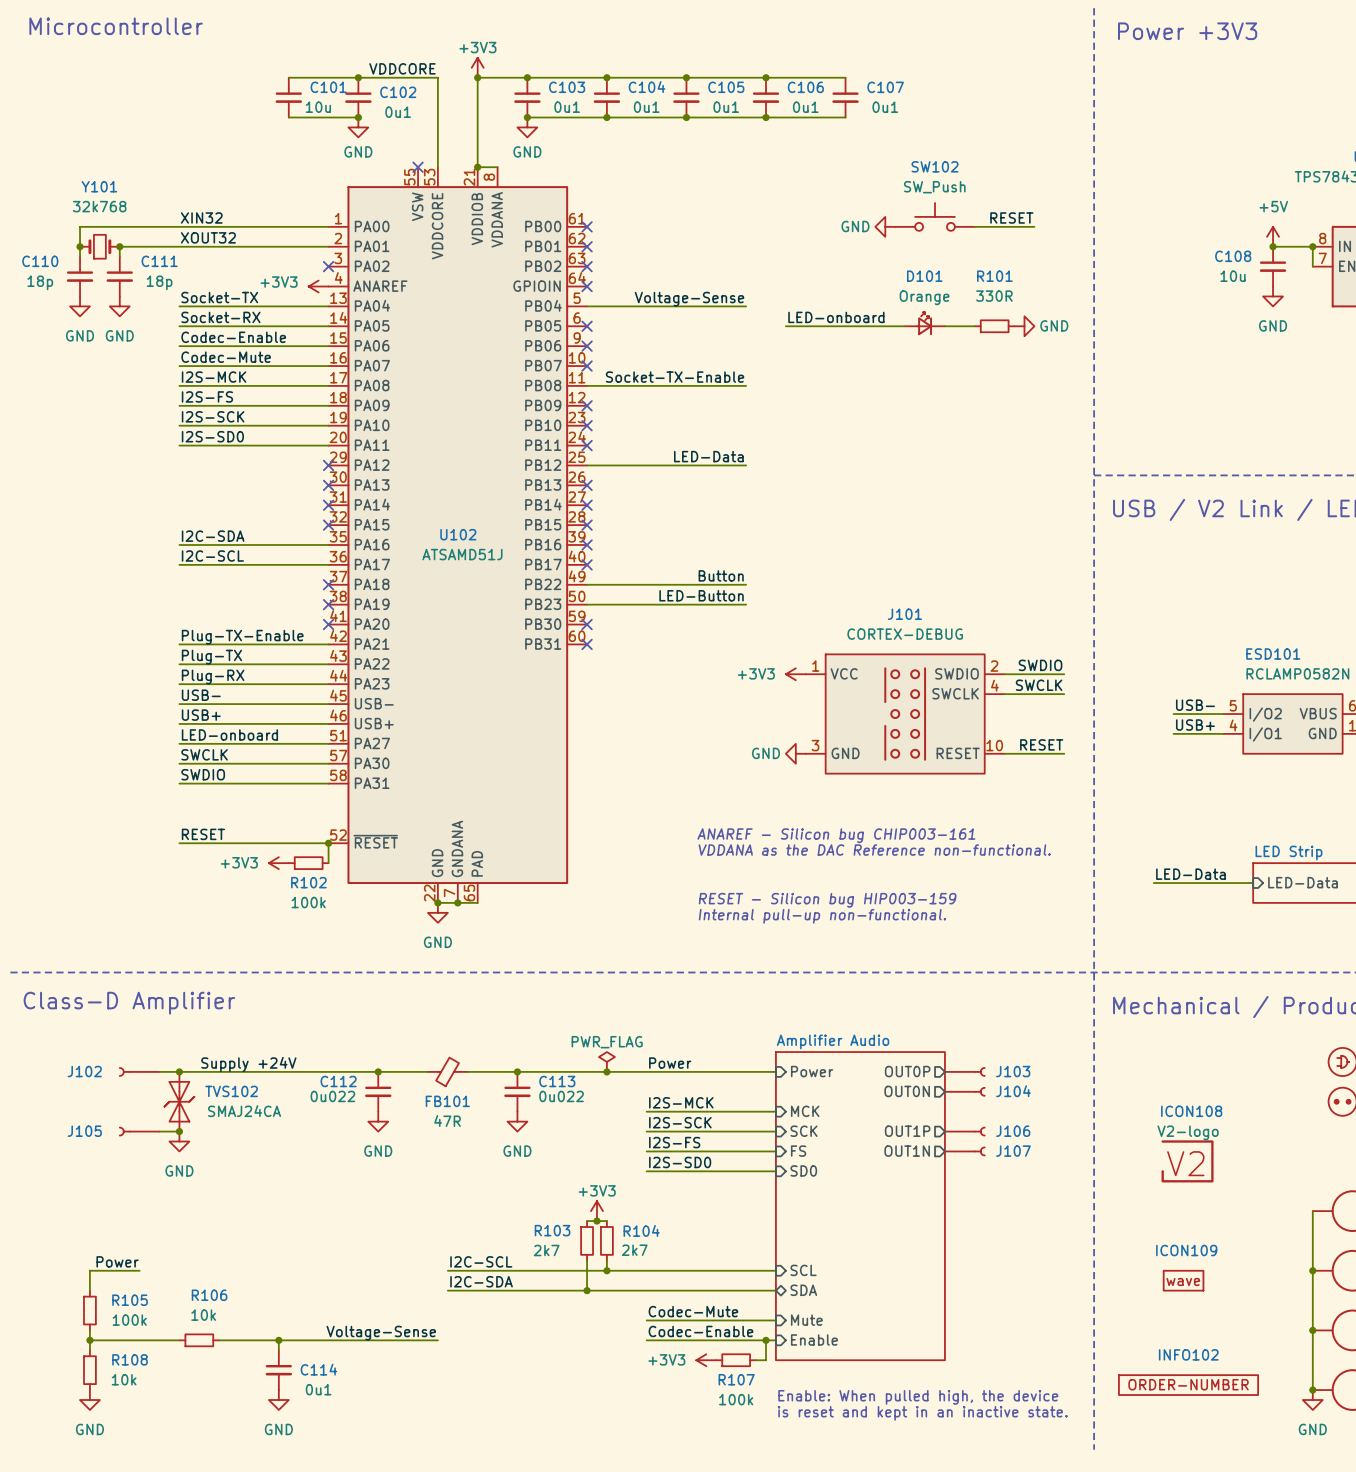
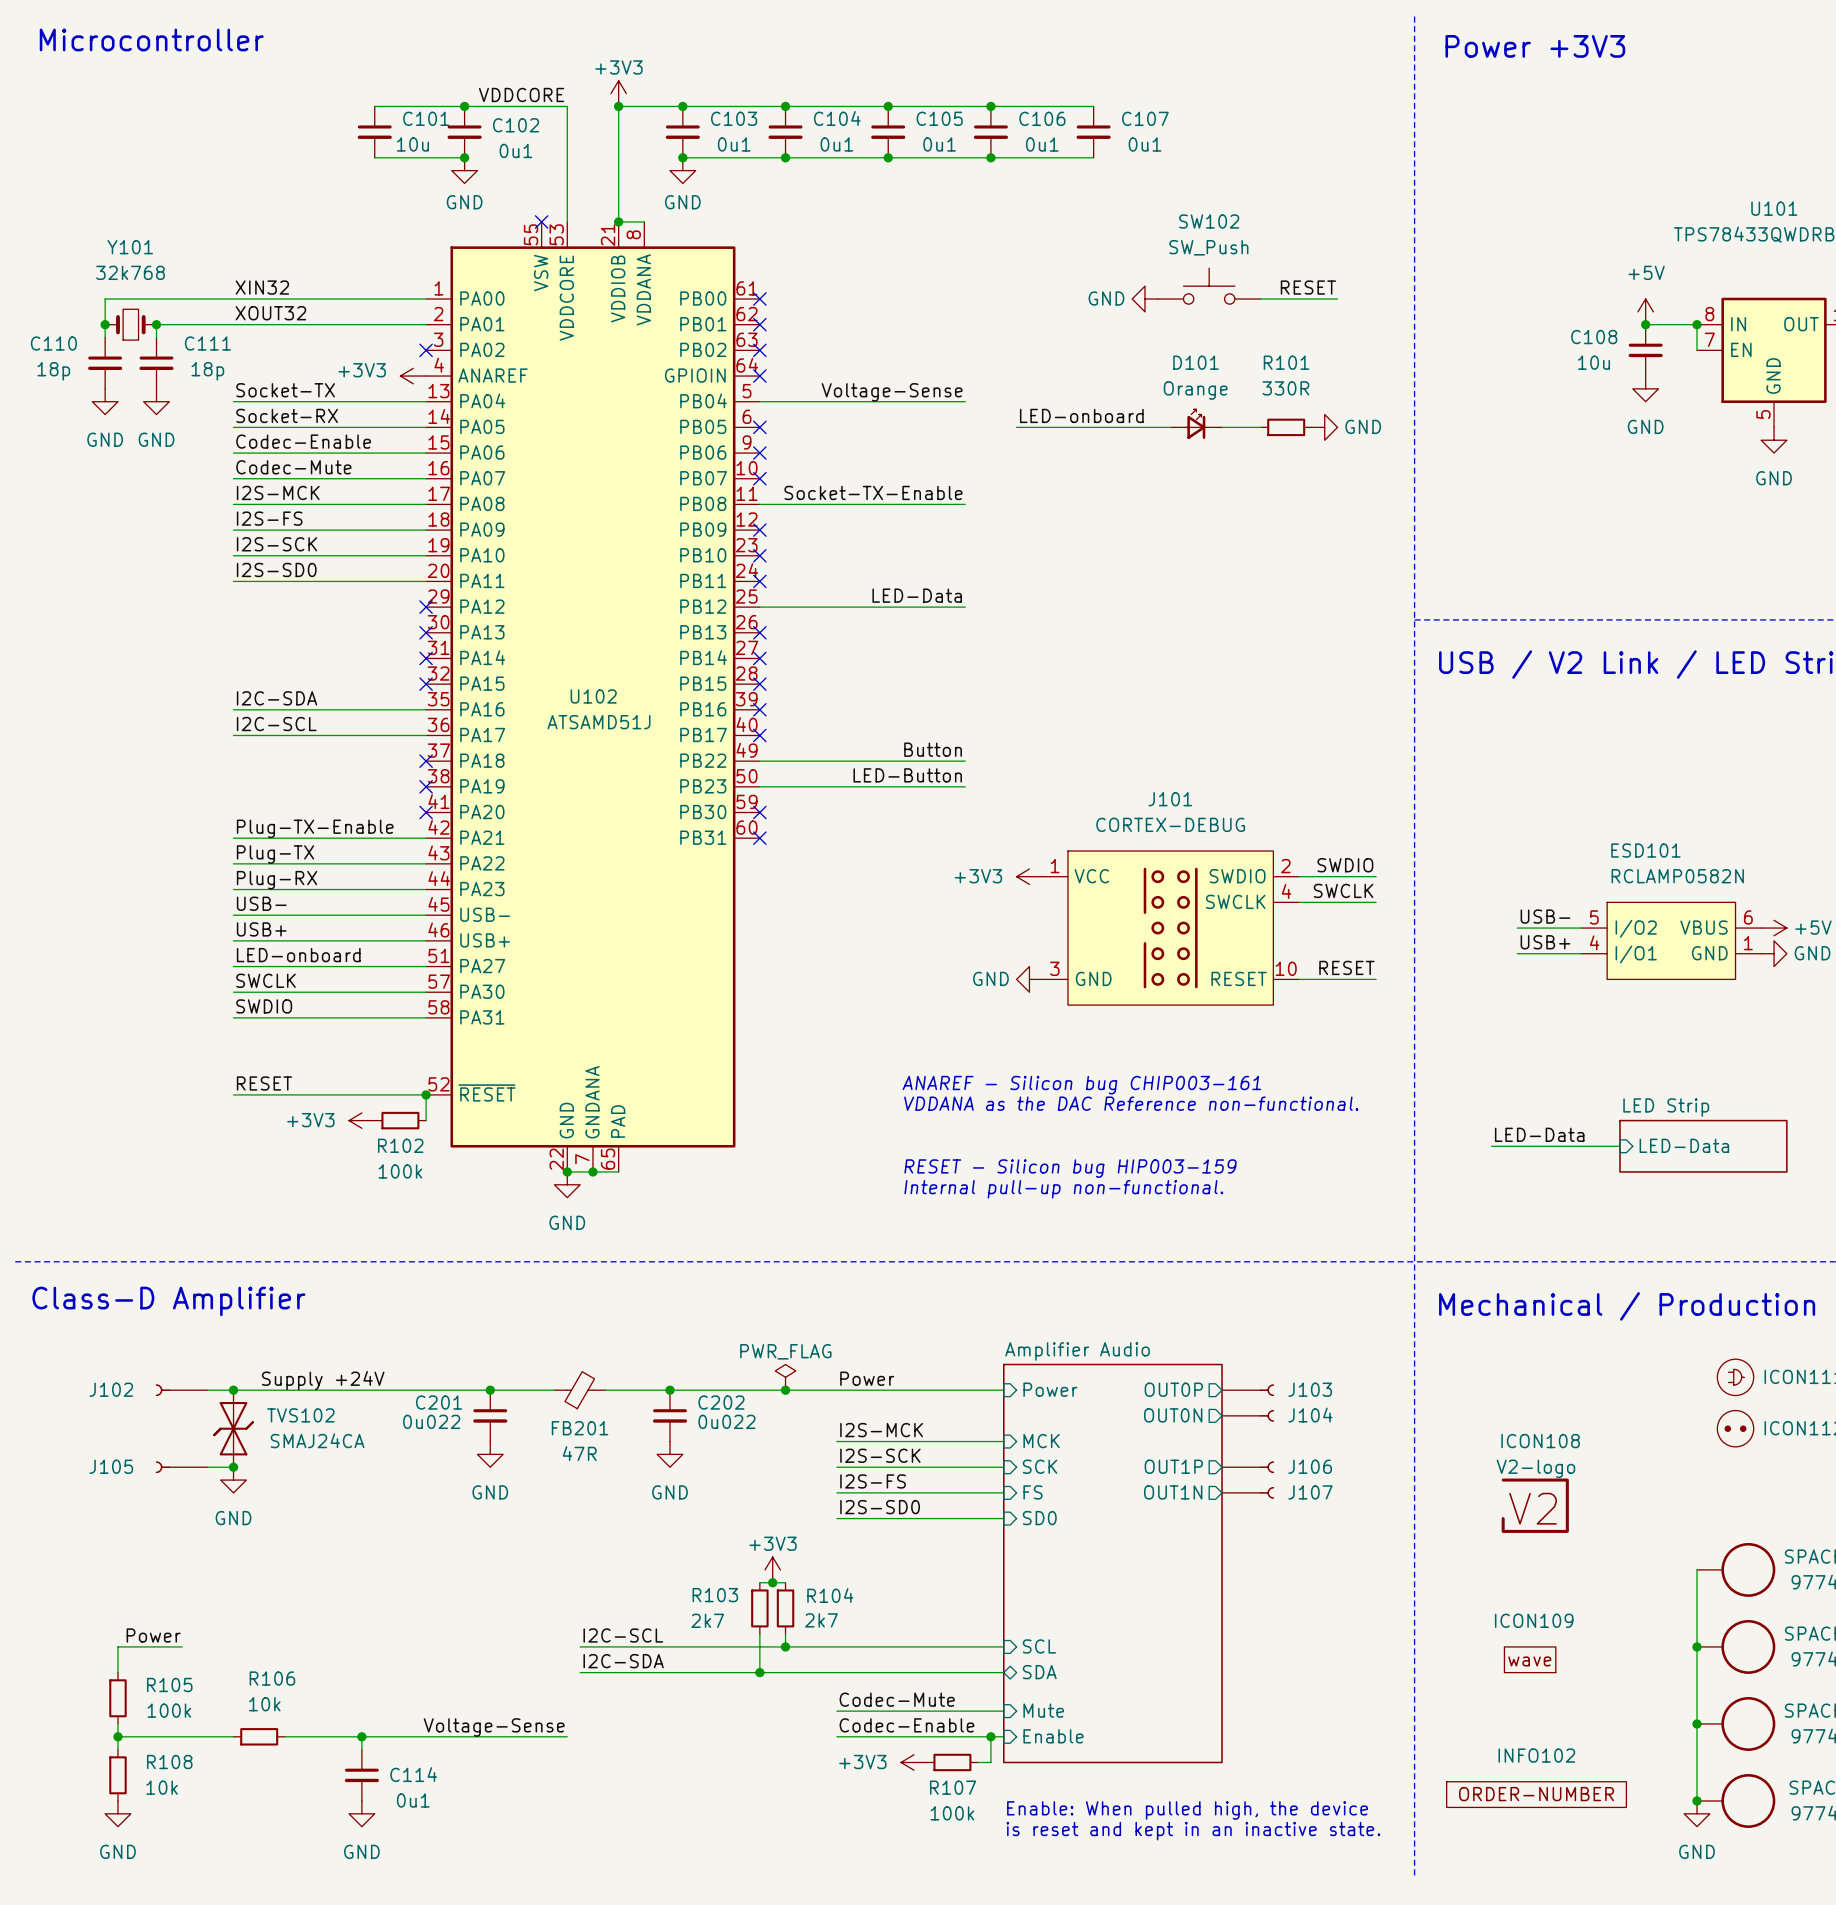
C112 name: C112 (338, 1081) -> C201 (439, 1402)
C113 name: C113 (557, 1081) -> C202 (721, 1402)
FB101 name: FB101 (447, 1101) -> FB201 (580, 1428)

